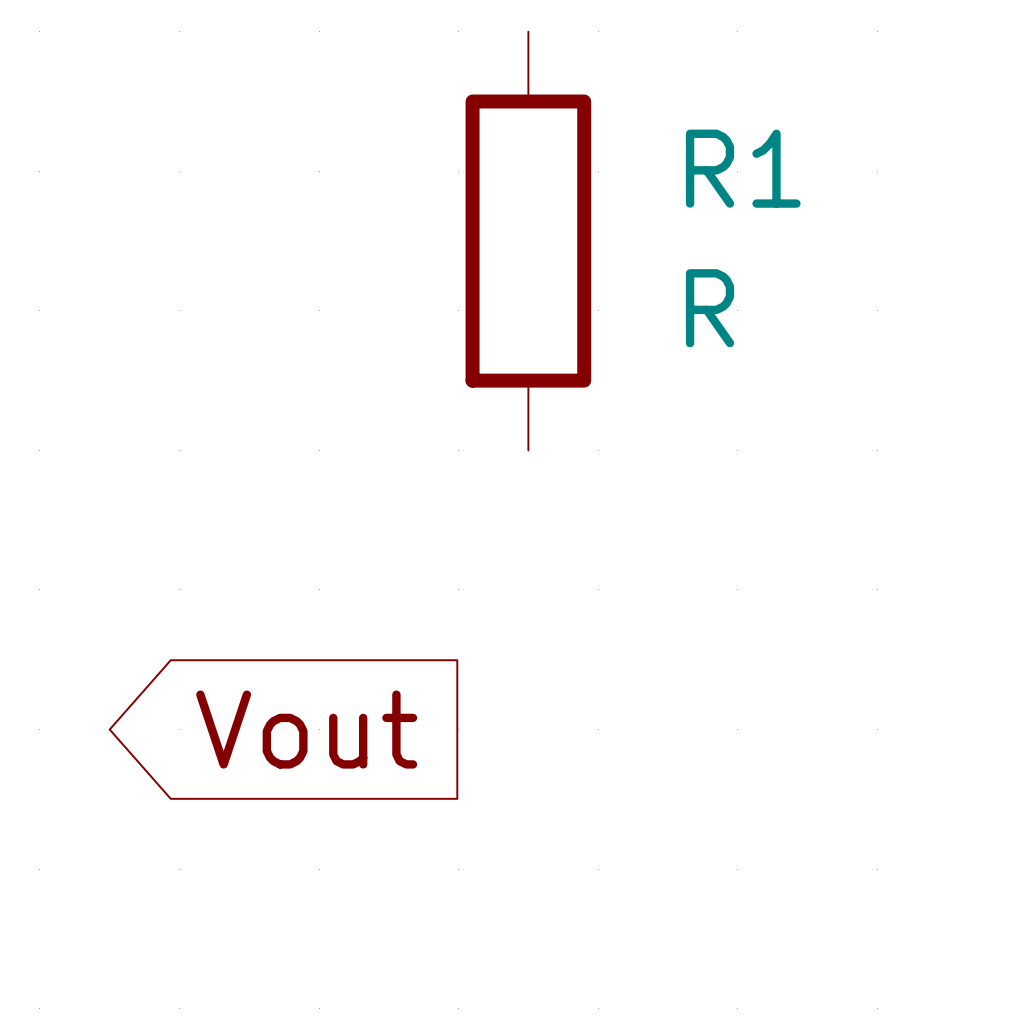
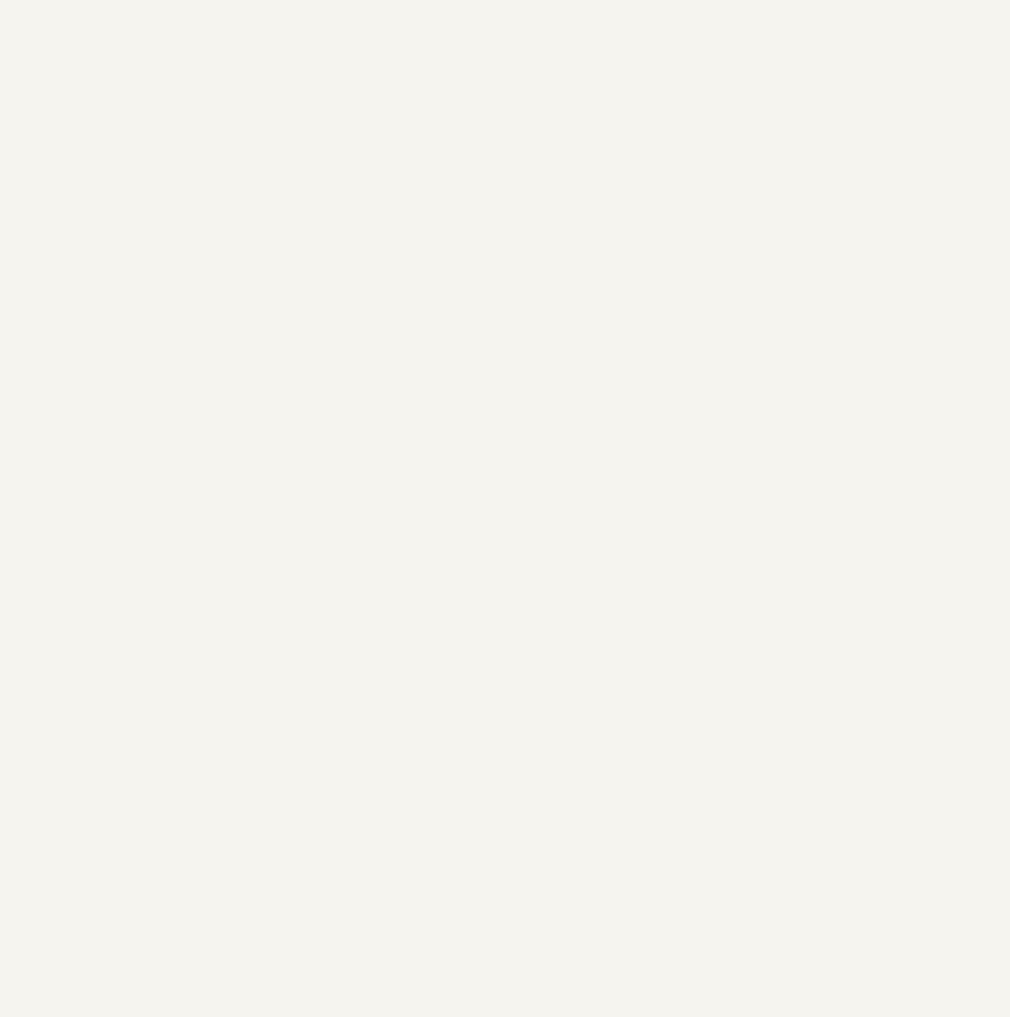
R1: R (528, 241) -> none
global label: Vout (306, 729) -> none

